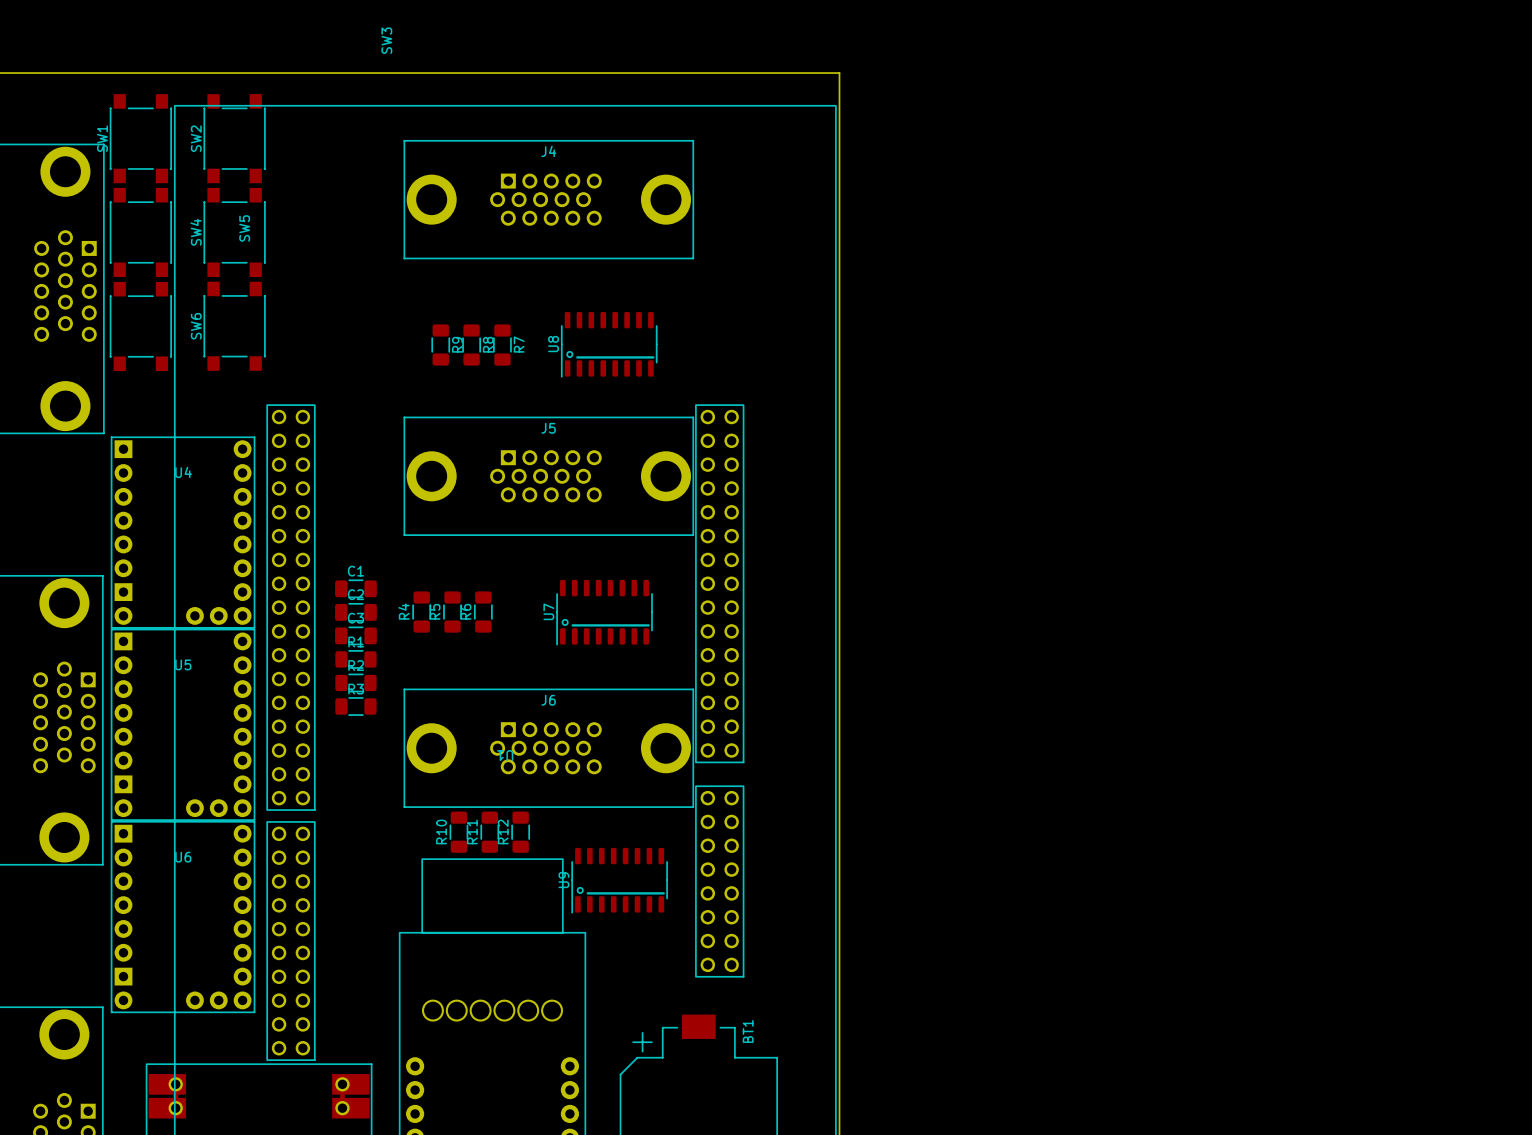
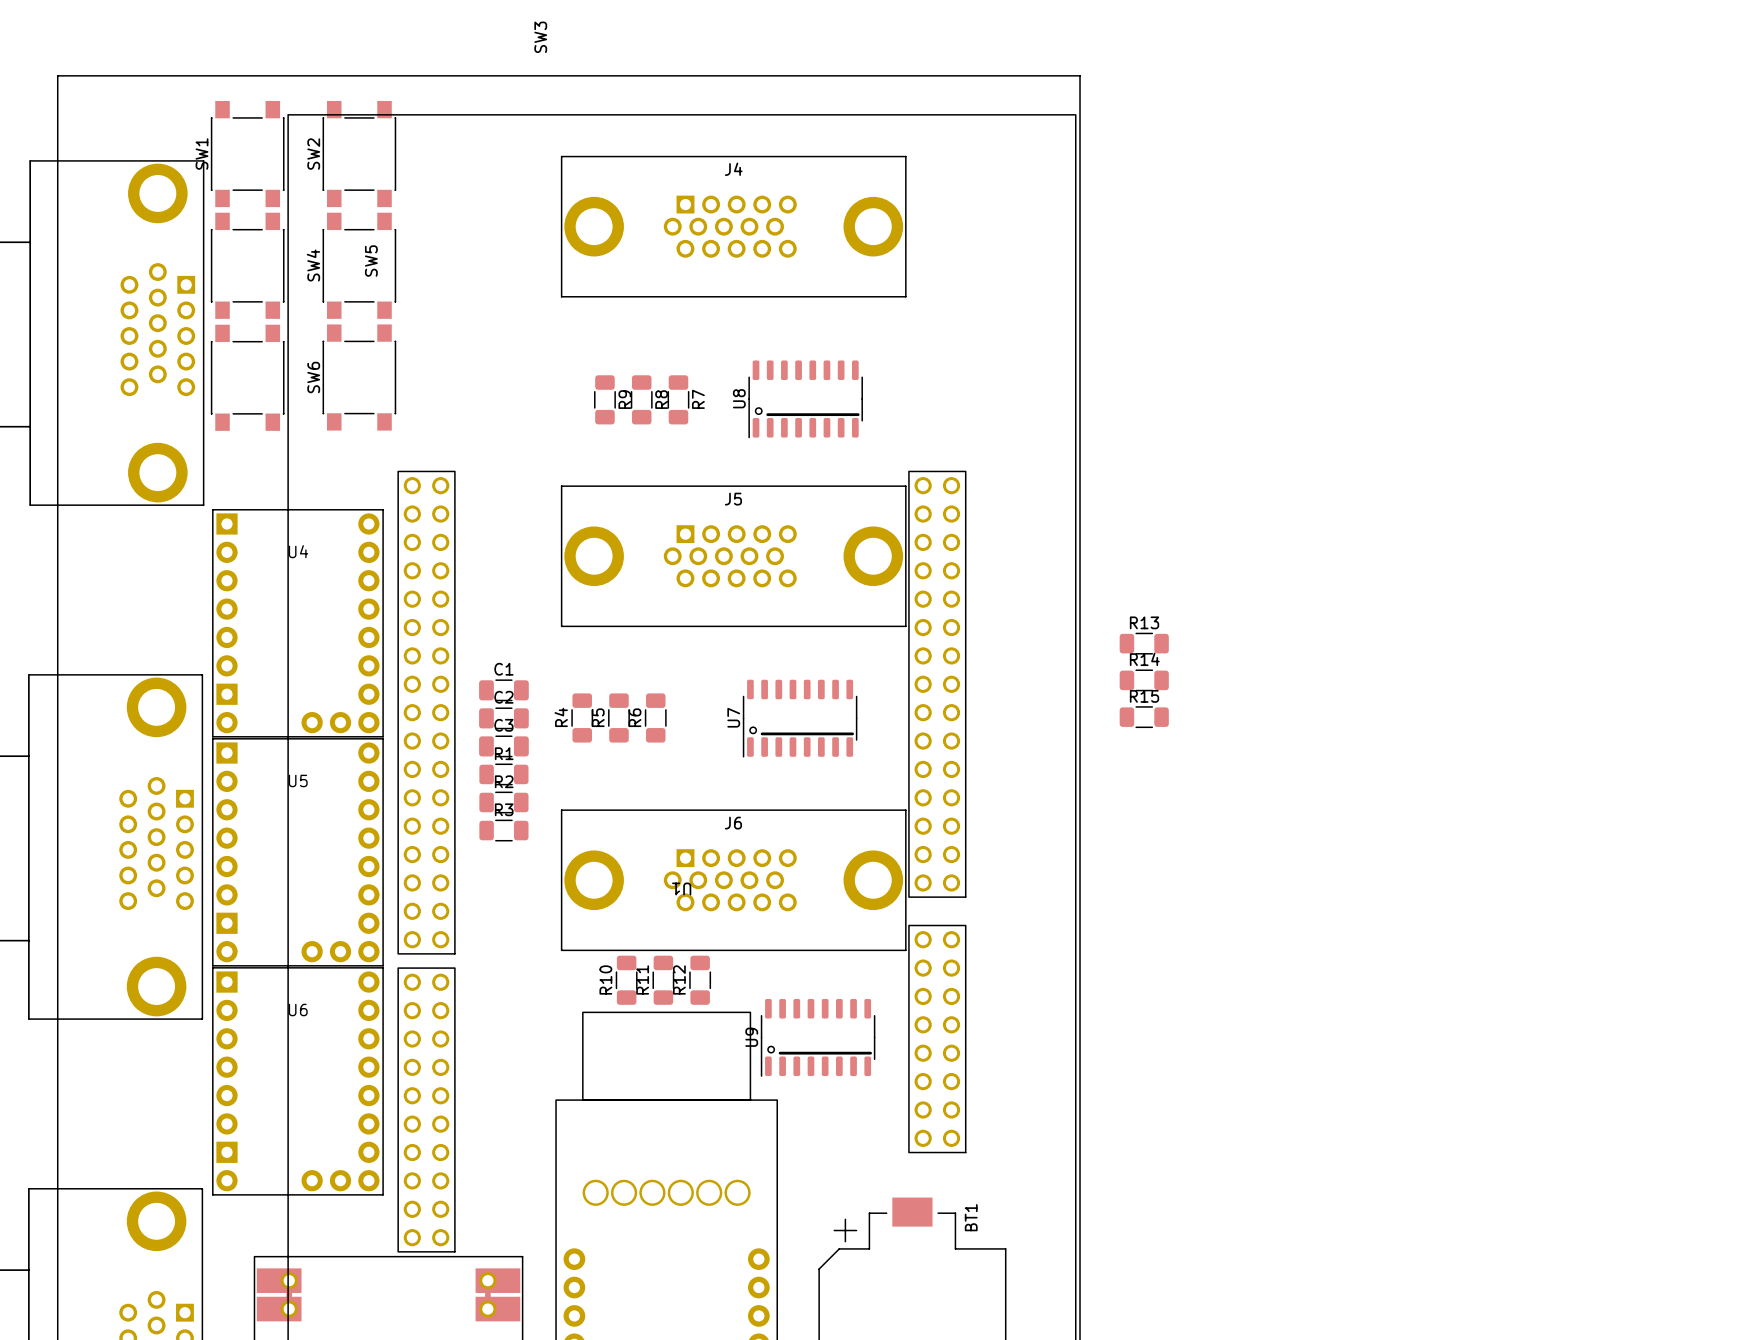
R13: none -> (1144, 643)
R14: none -> (1144, 680)
R15: none -> (1144, 717)

